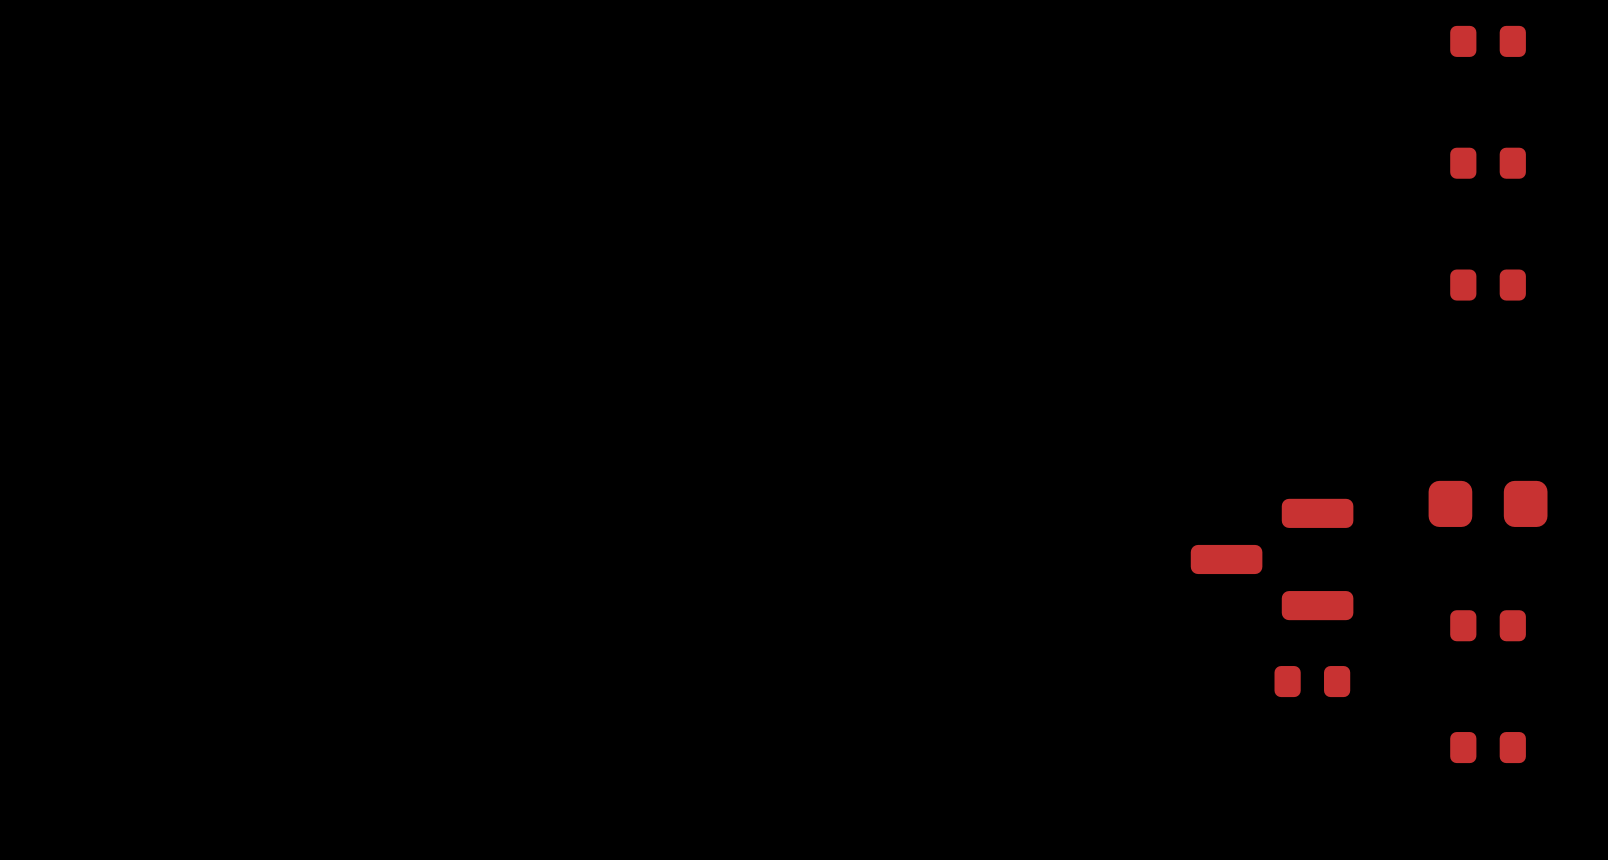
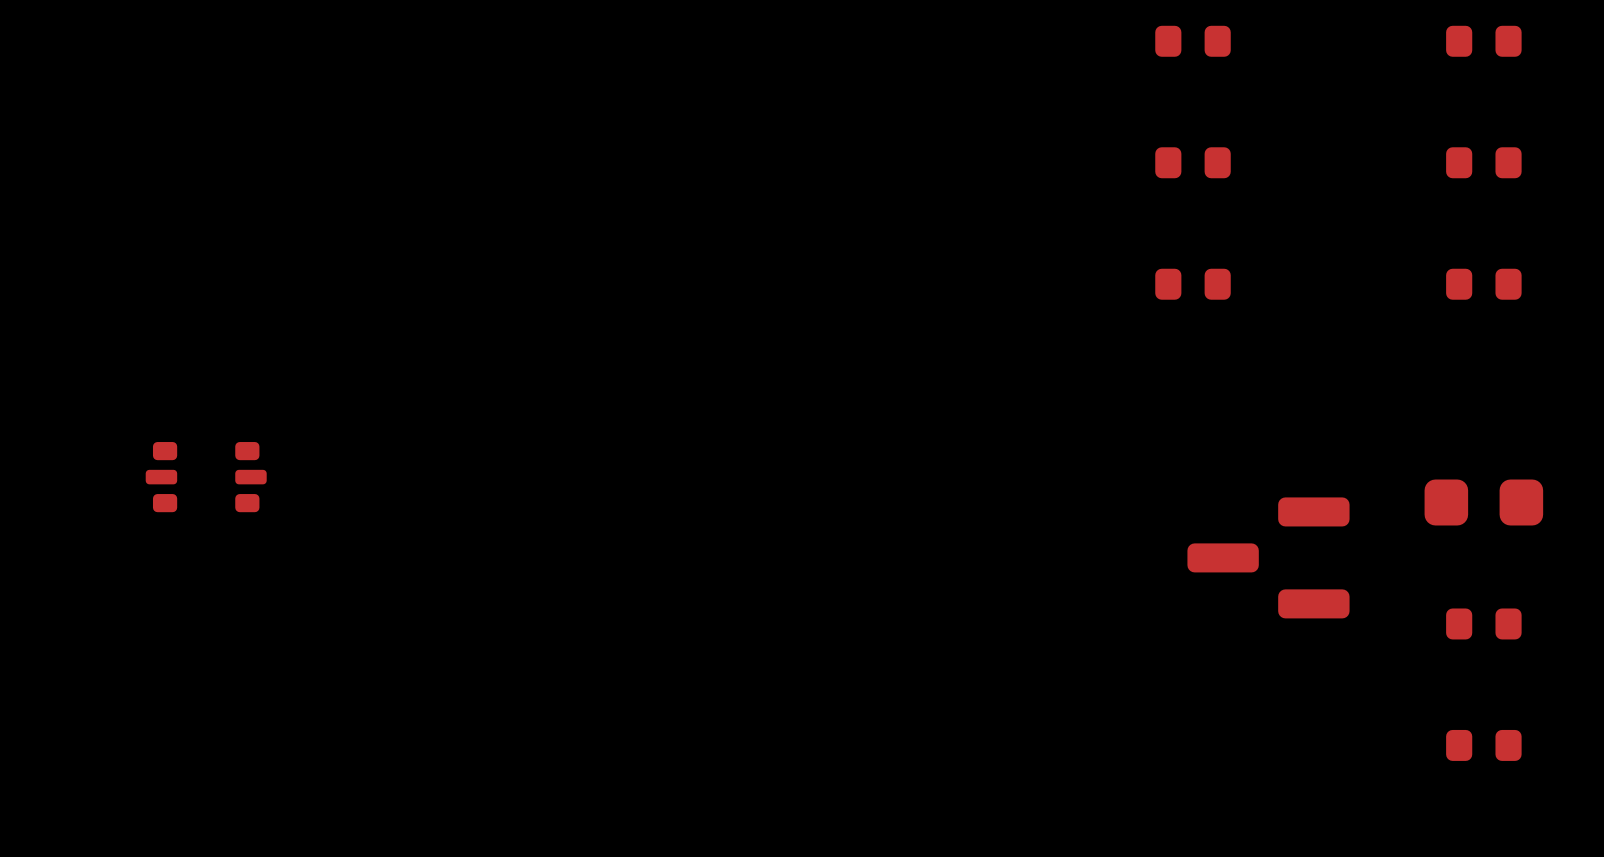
part: none -> (1193, 41)
part: none -> (1193, 162)
part: none -> (1193, 284)
part: none -> (206, 477)
part: (1312, 681) -> none

